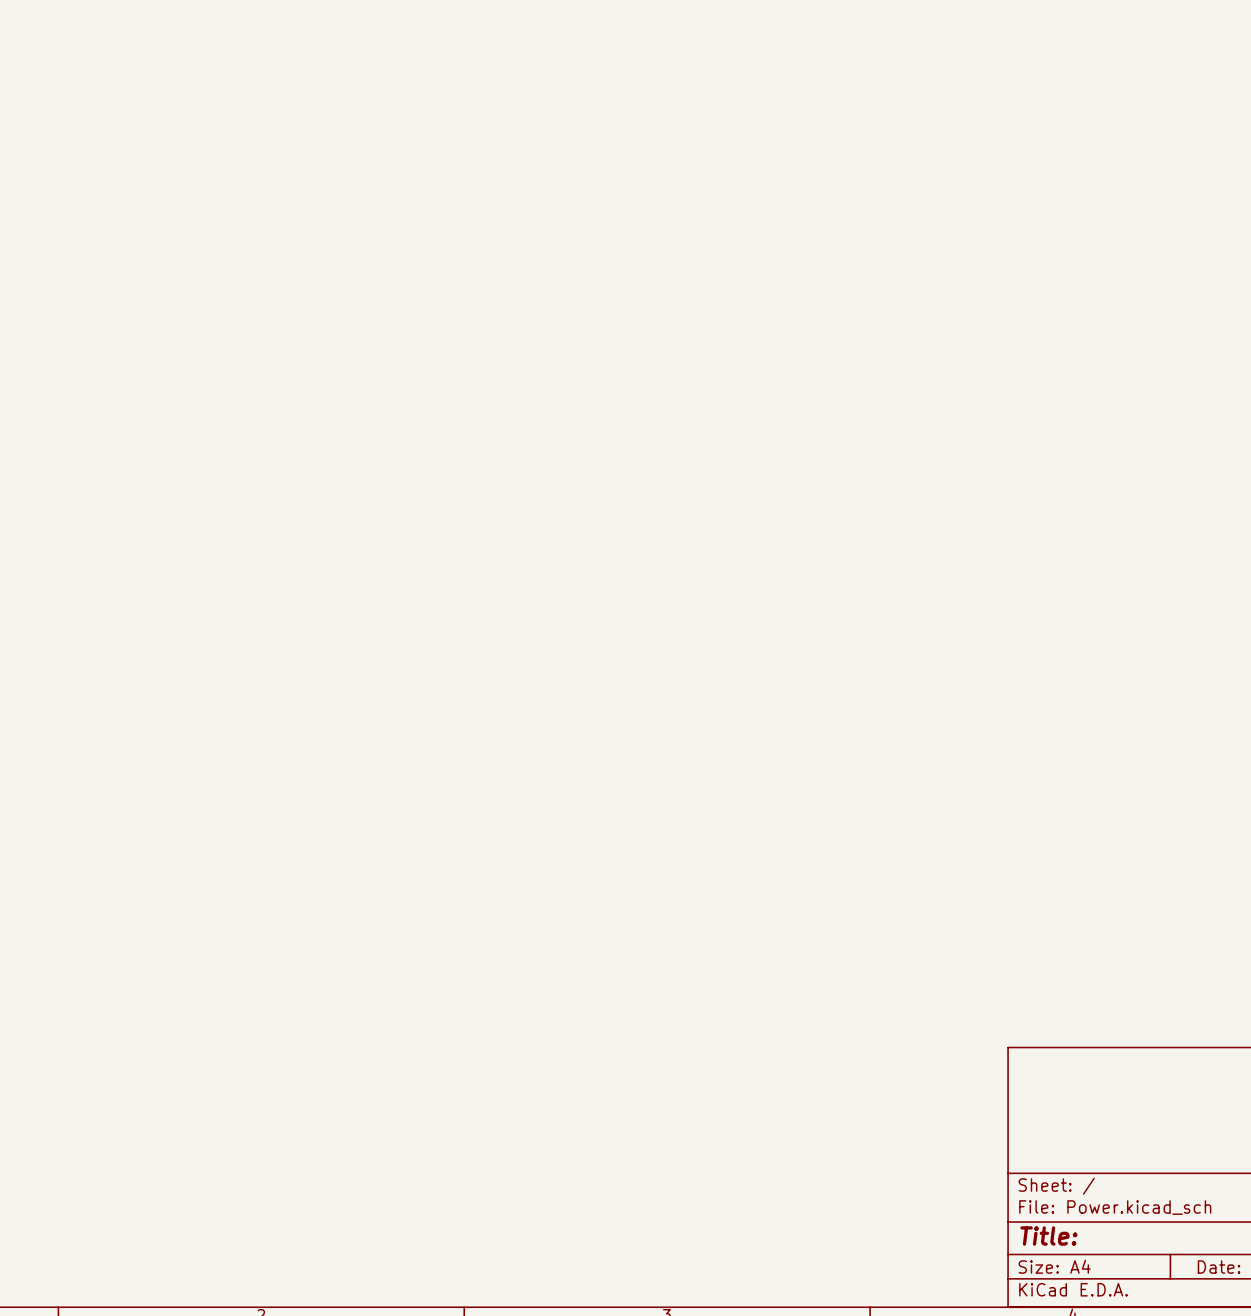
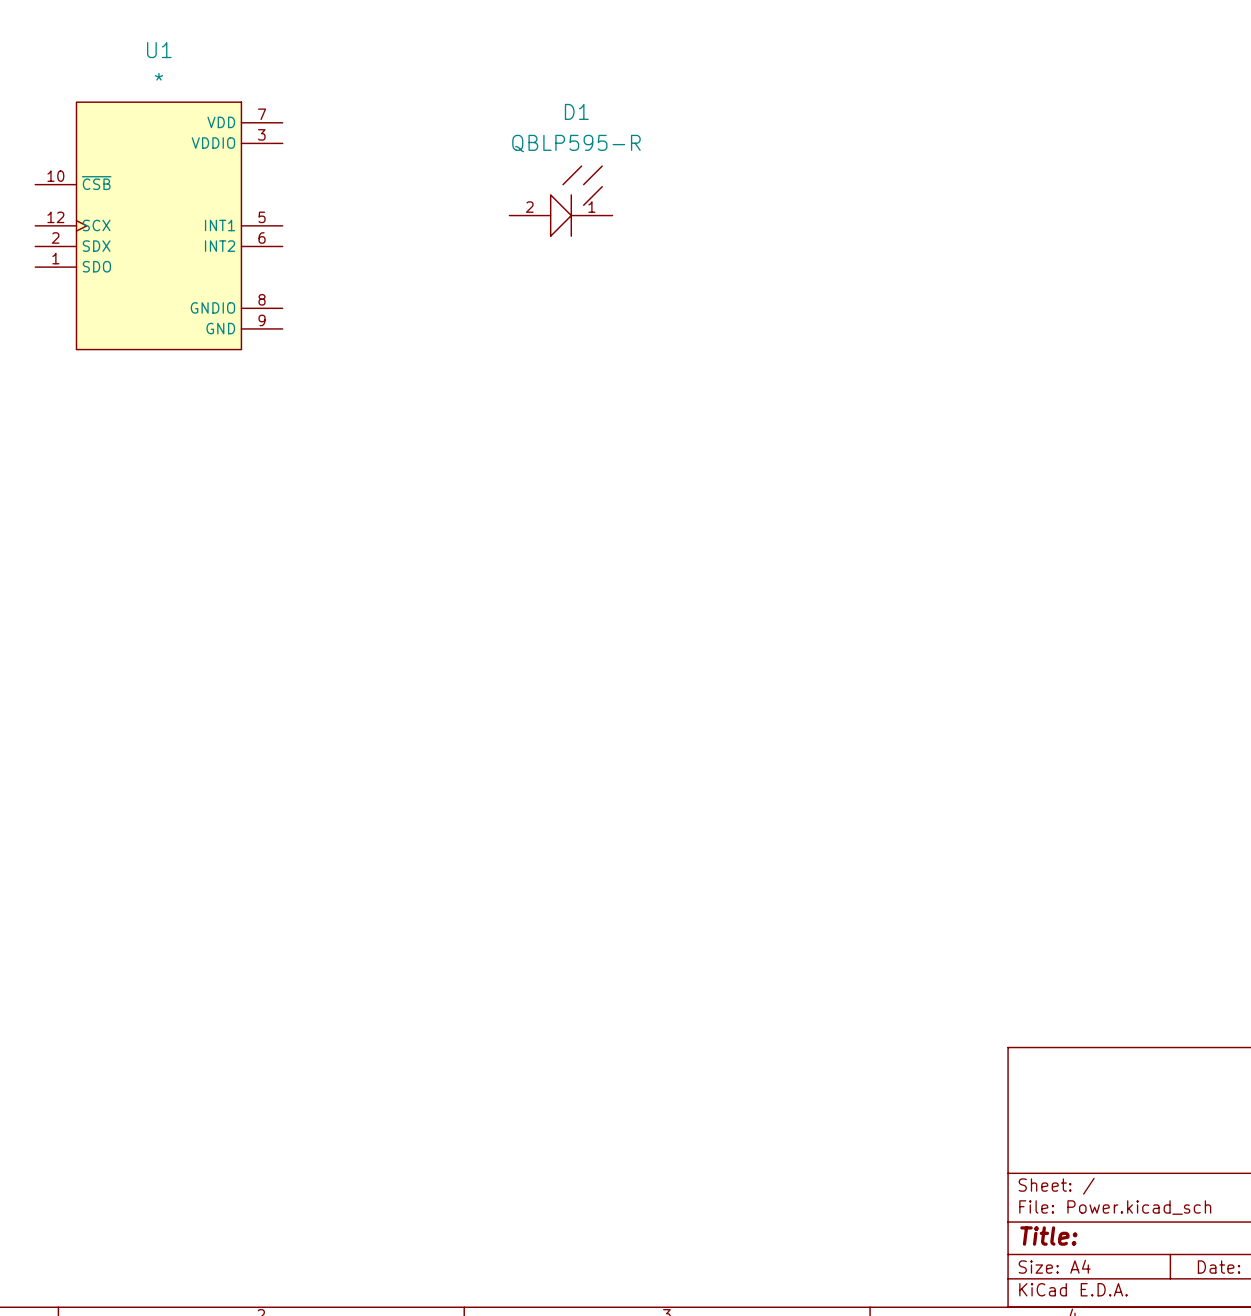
D1: none -> QBLP595-R (560, 201)
U1: none -> * (158, 225)

